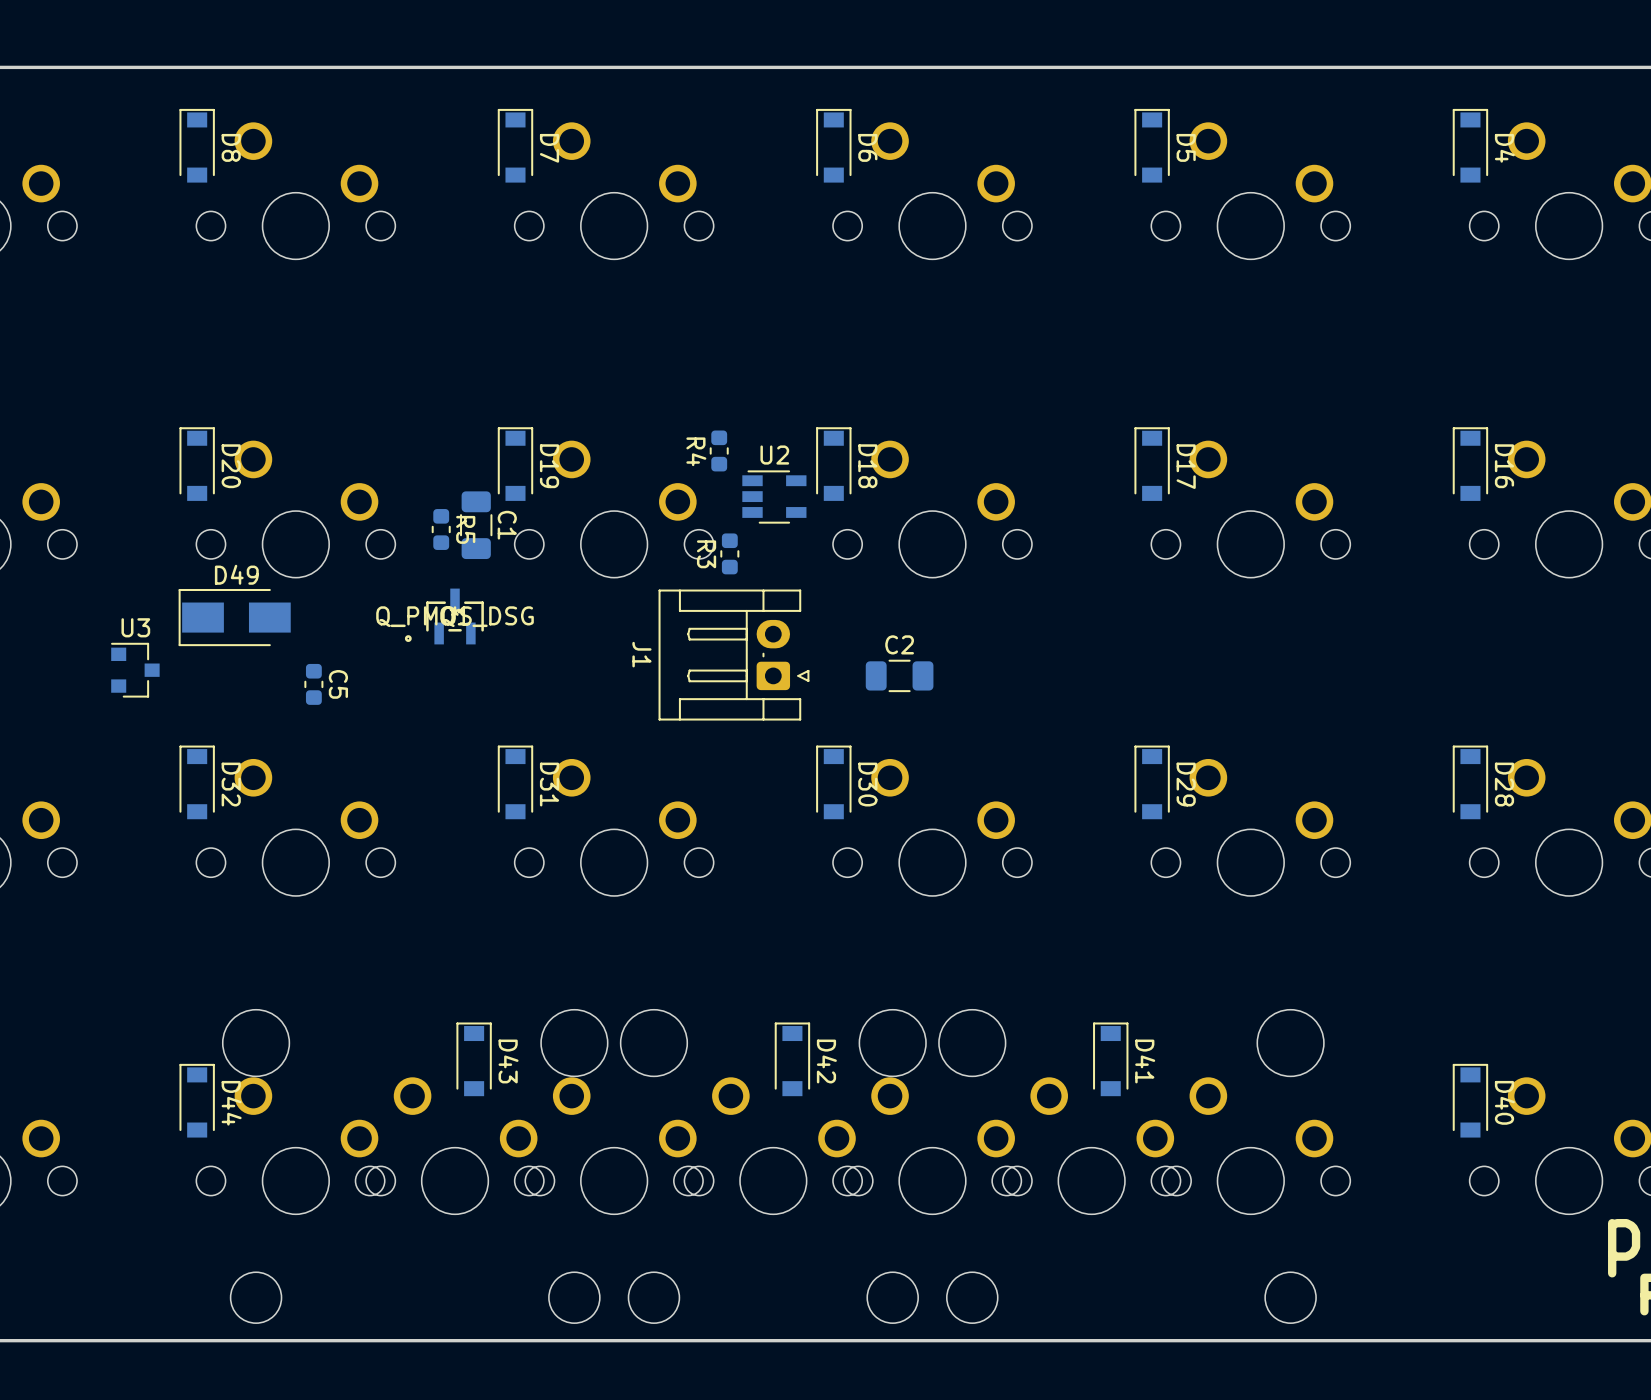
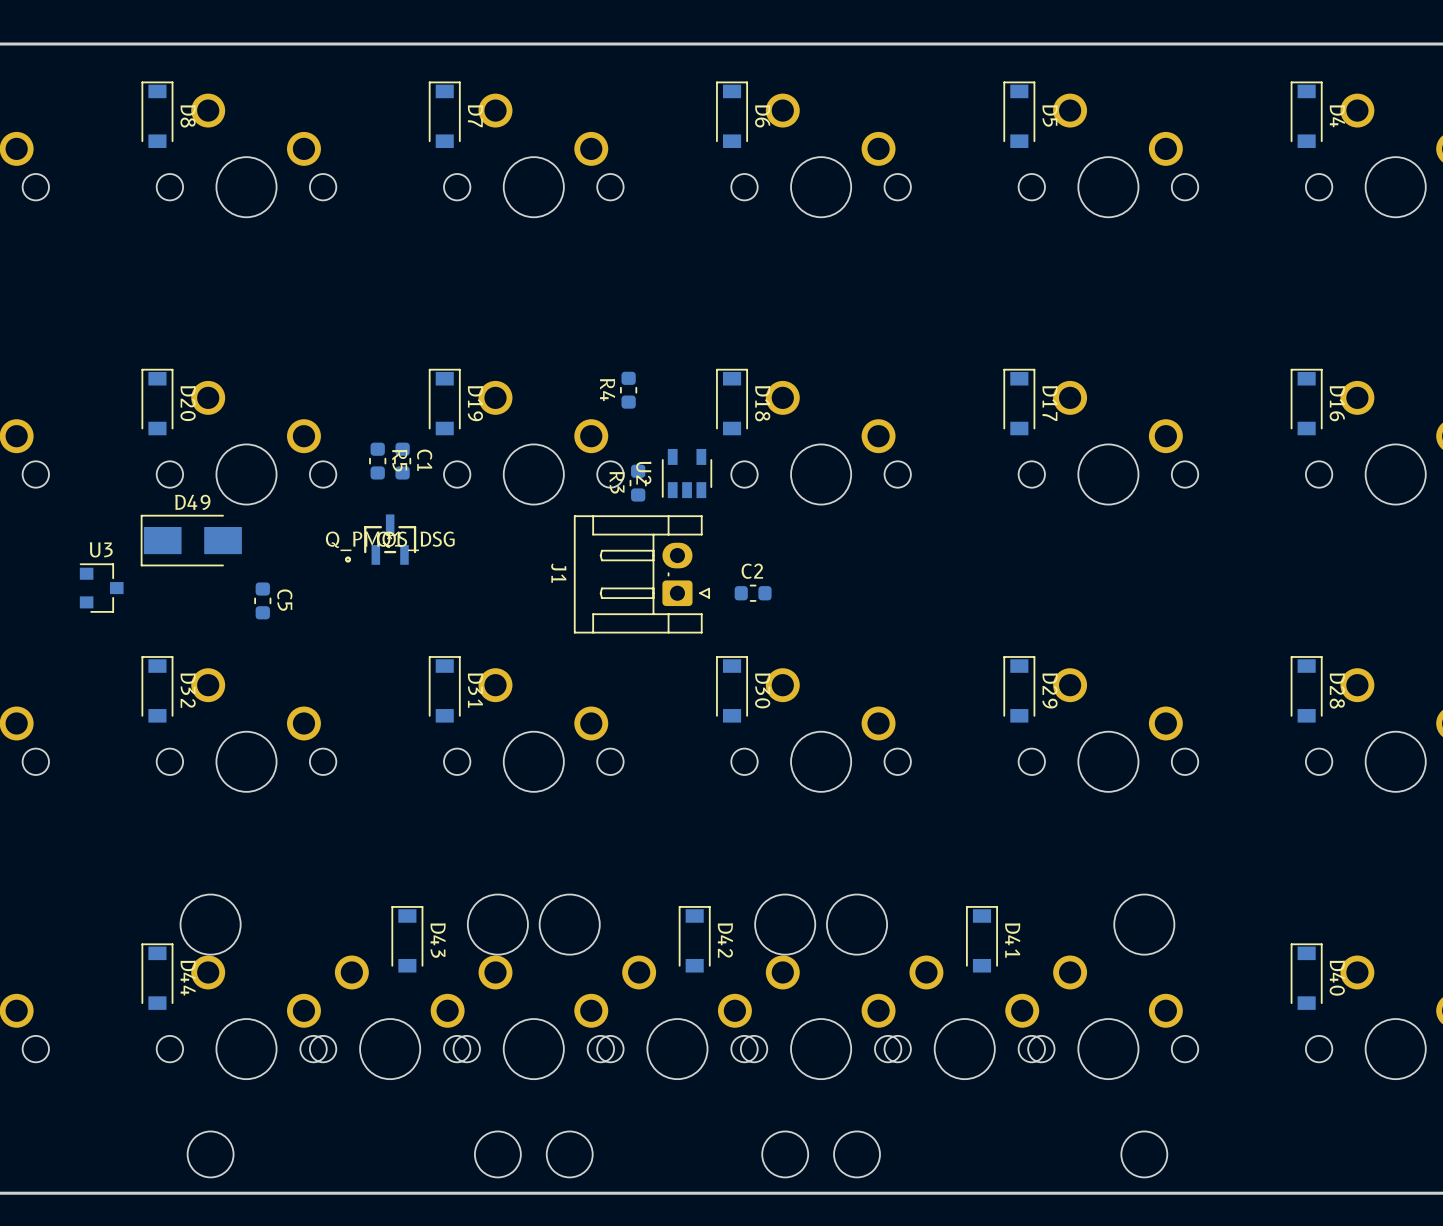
U2 name position: U2 (774, 455) -> U2 (643, 473)
U2 footprint: [742, 470, 807, 524] -> [661, 448, 713, 499]
C1 footprint: [460, 491, 493, 560] -> [394, 442, 412, 480]
C2 footprint: [865, 659, 934, 693] -> [734, 584, 772, 602]

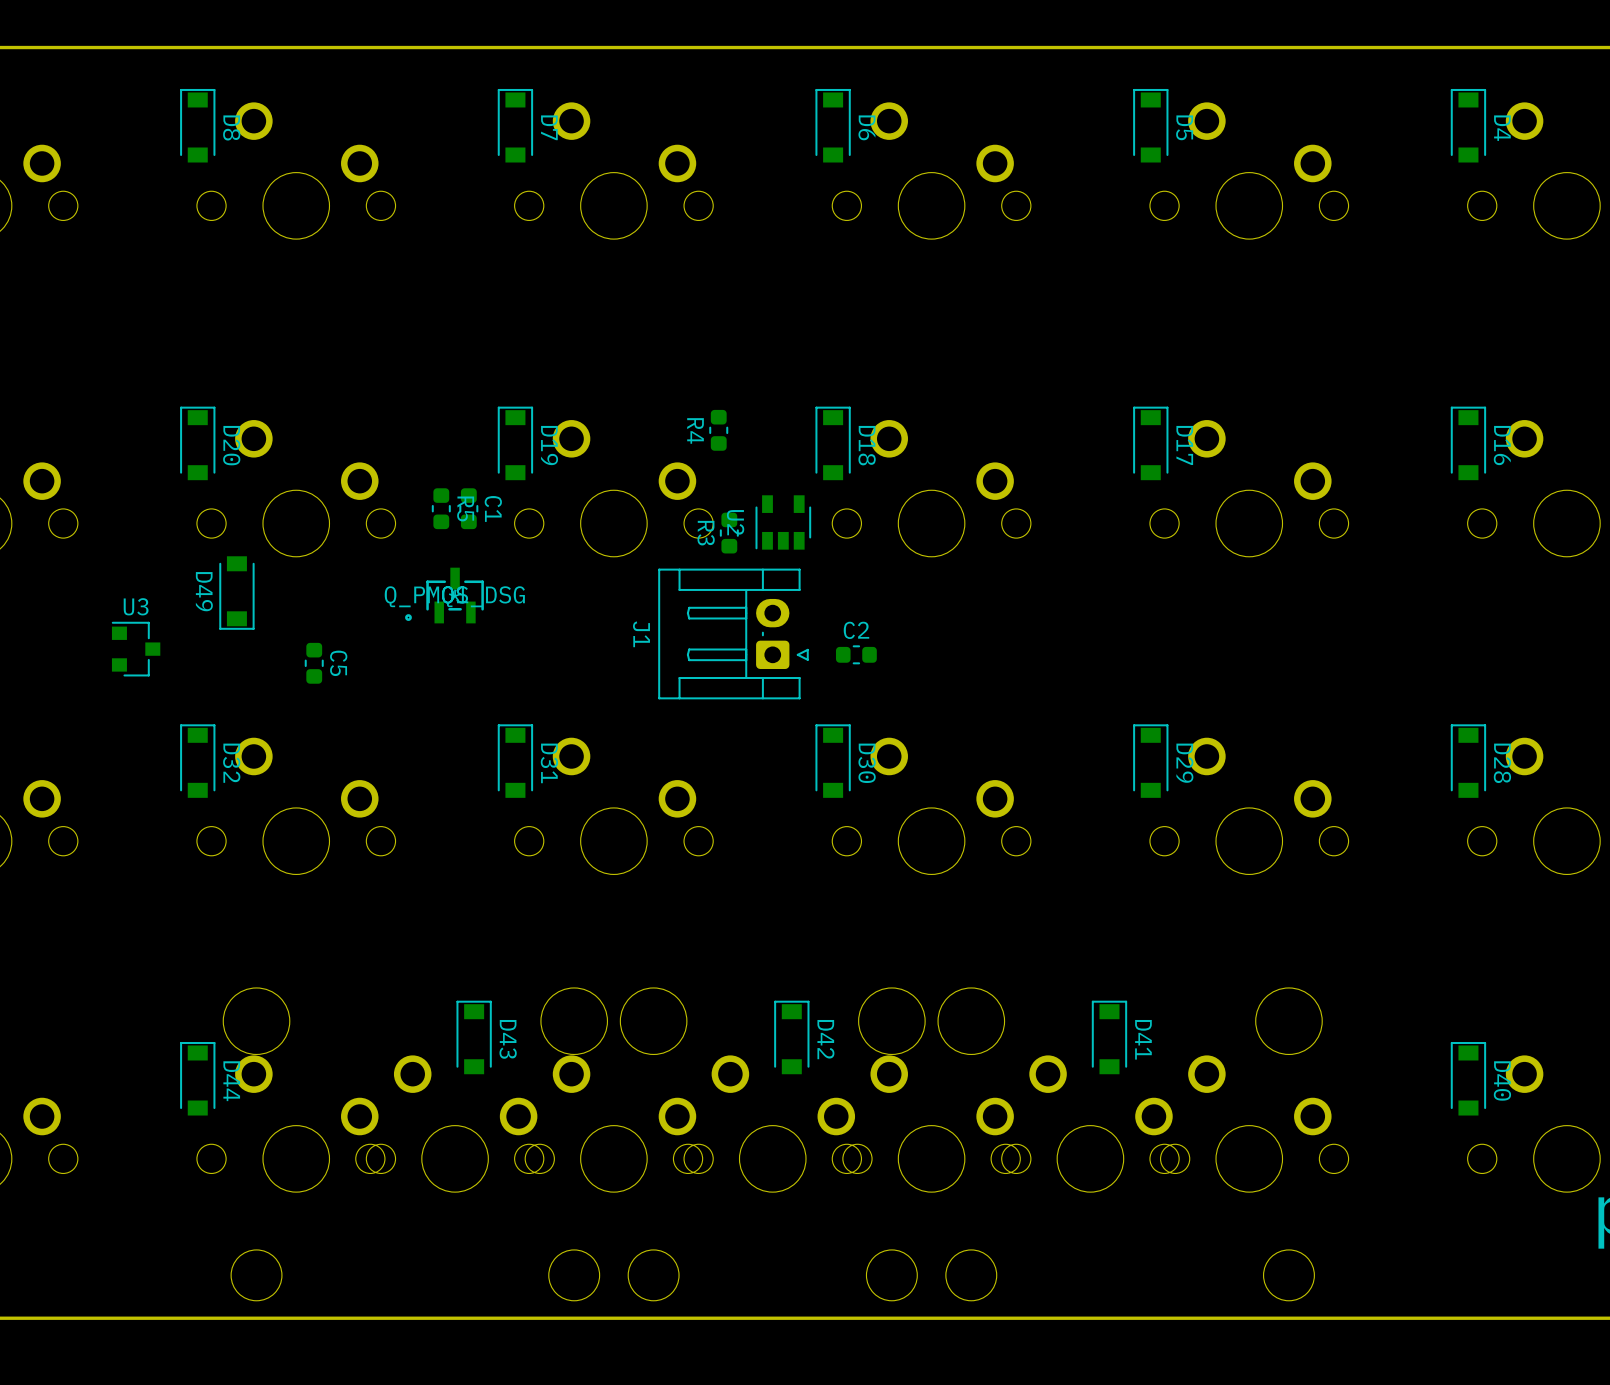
D49 name position: D49 (192, 502) -> D49 (204, 591)
D49 footprint: [140, 514, 242, 567] -> [219, 556, 255, 630]

